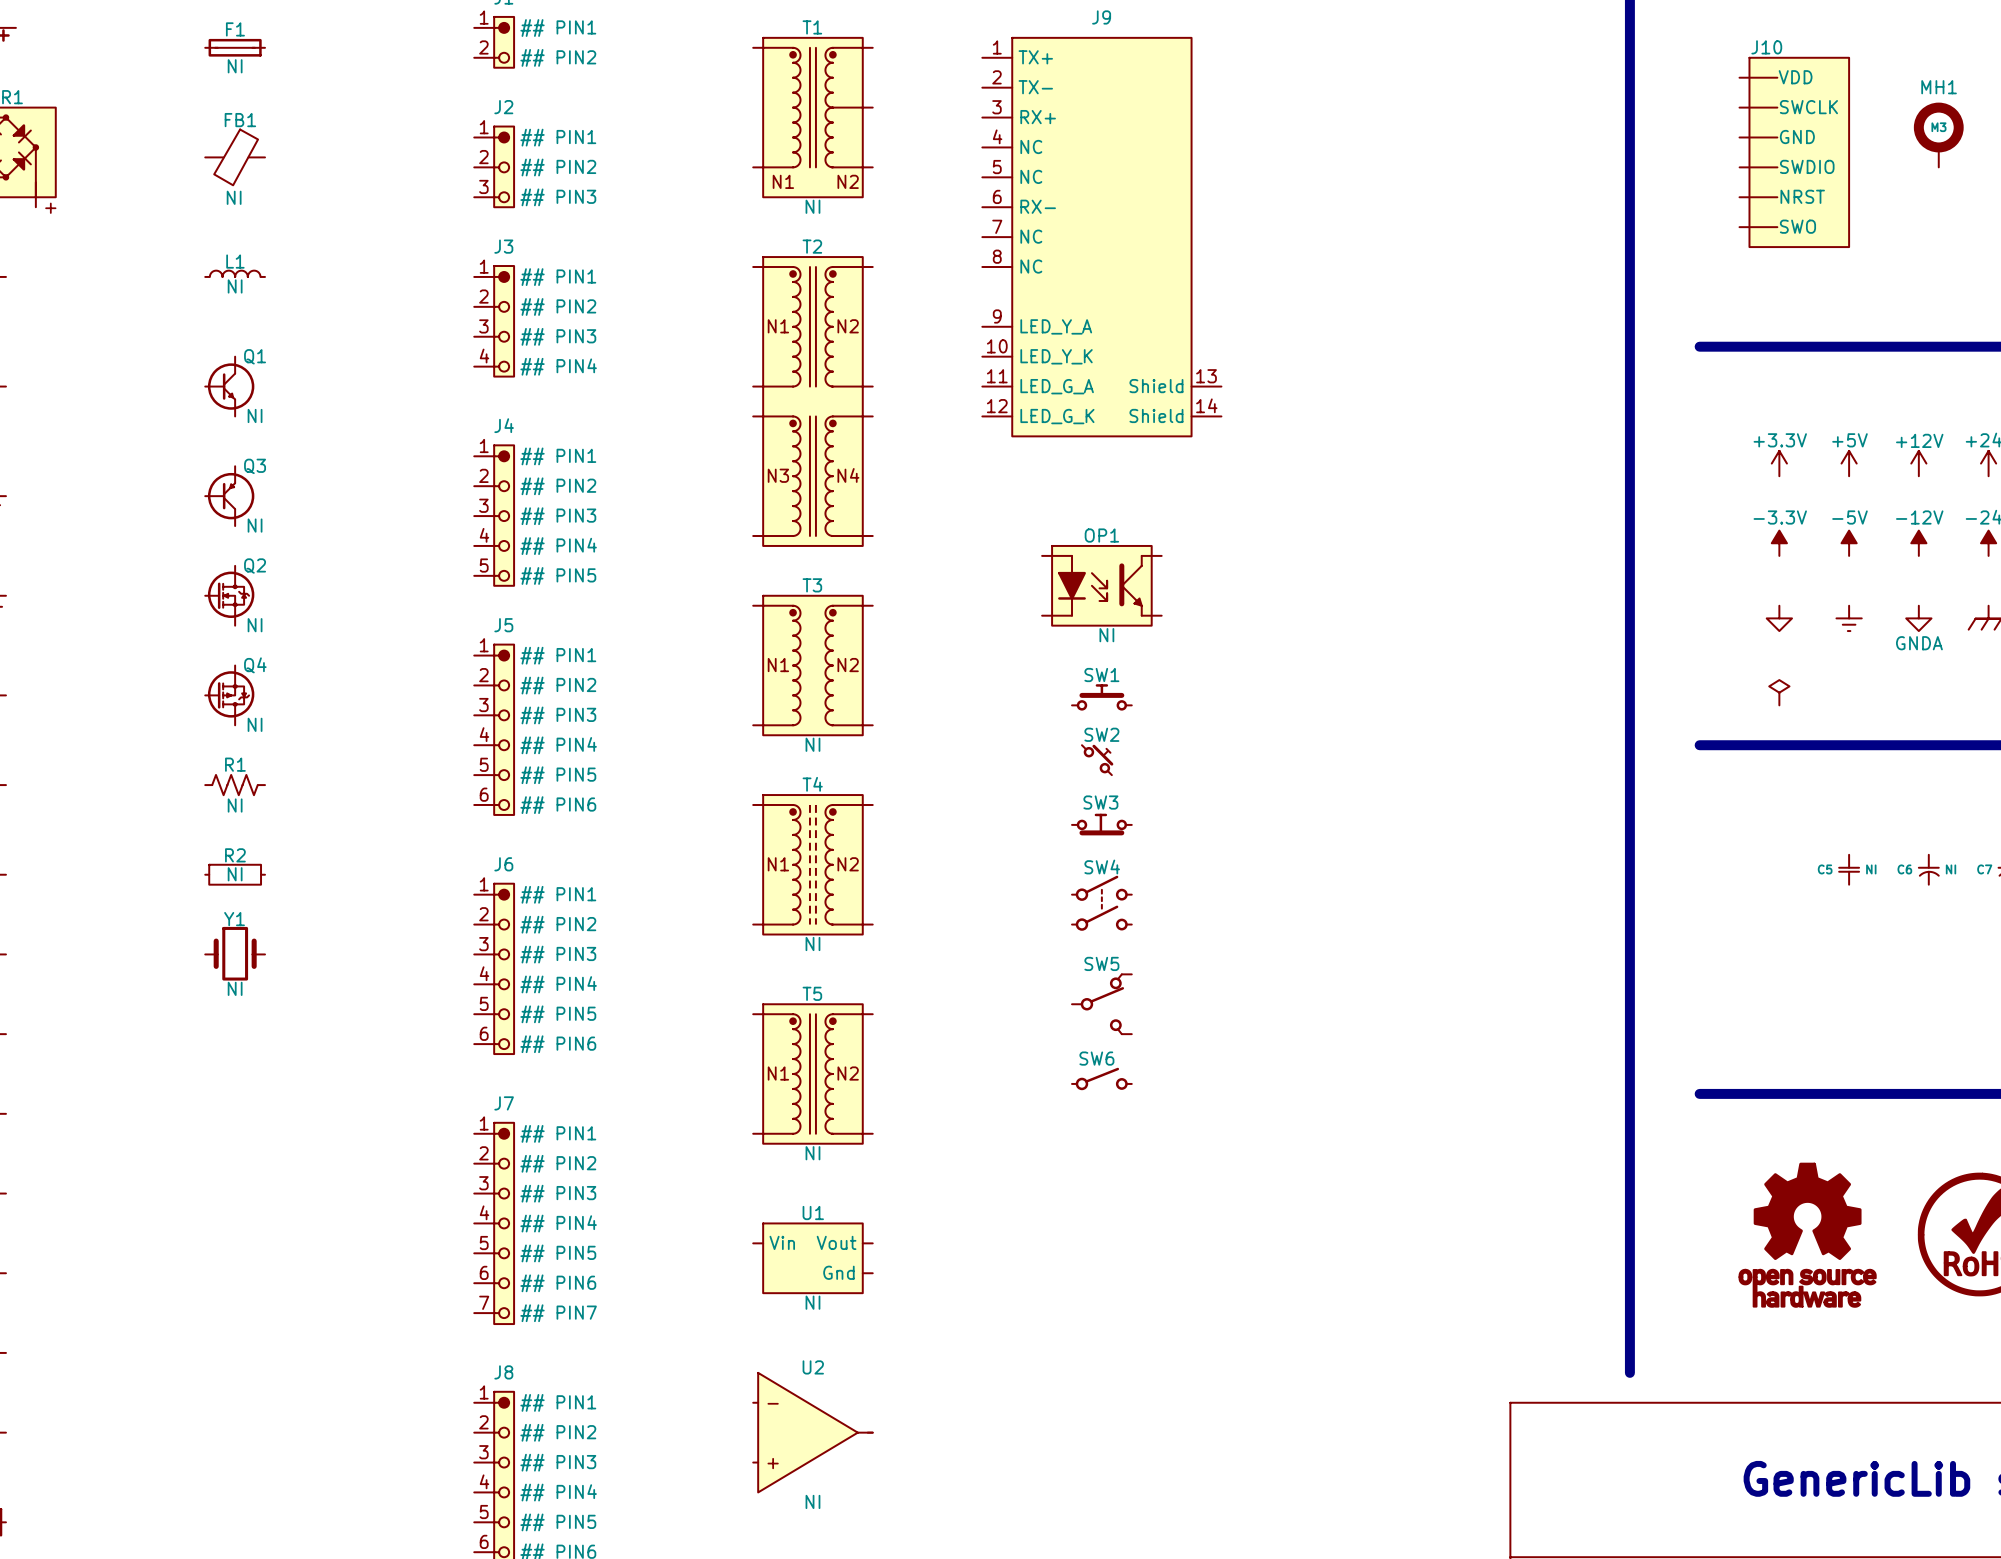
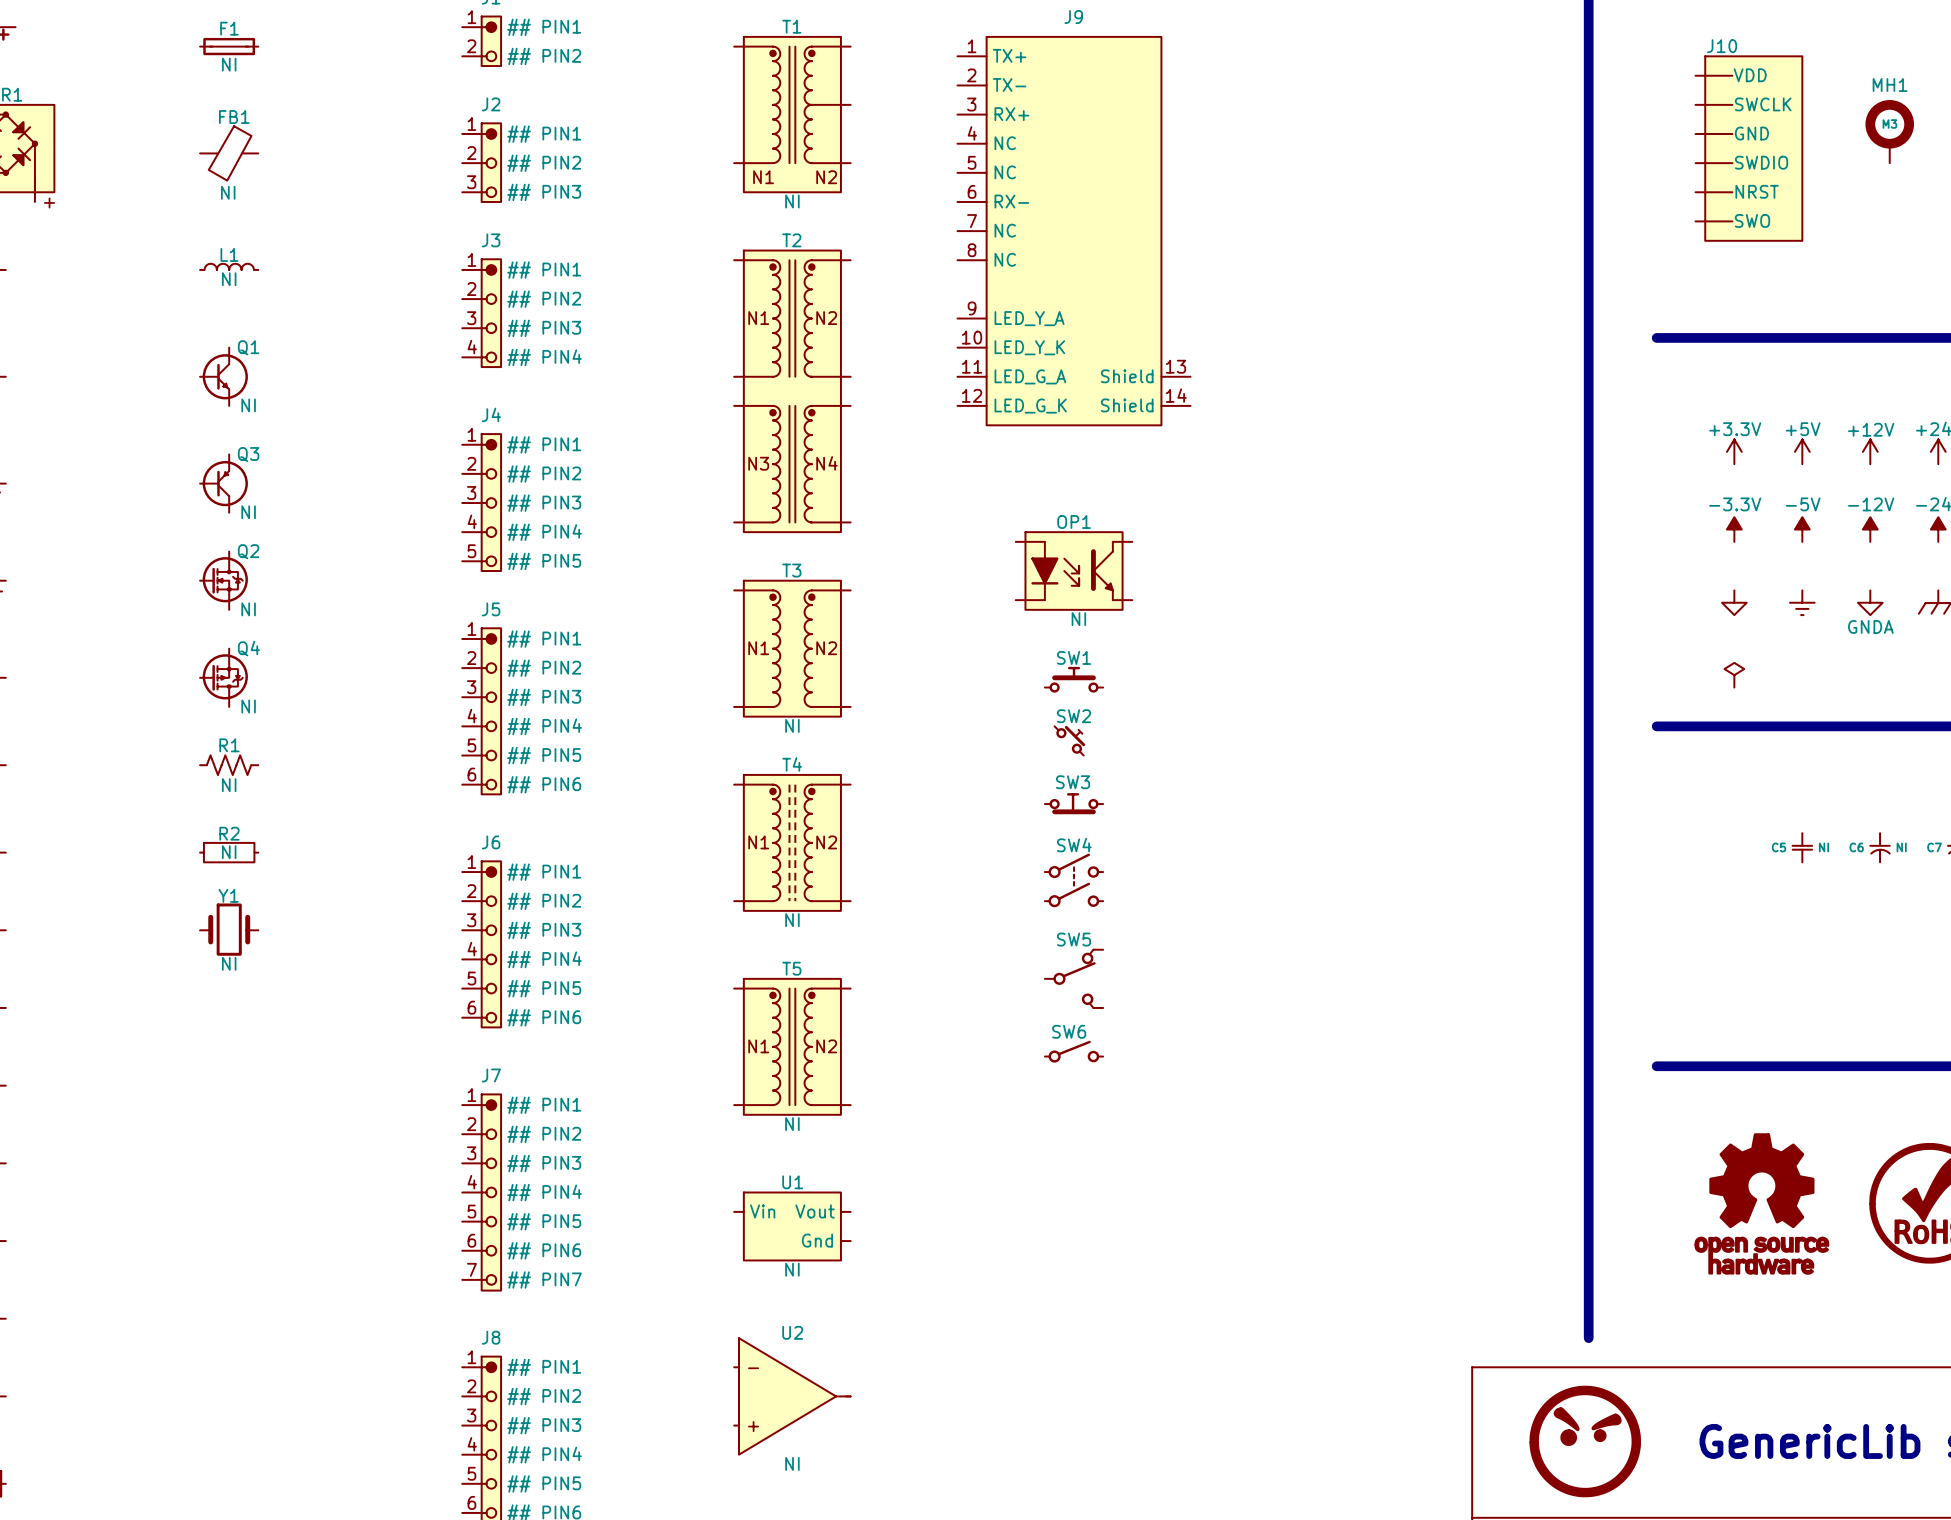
U1 symbol: [753, 1223, 873, 1294] -> [734, 1192, 851, 1261]
part: none -> (1585, 1441)

